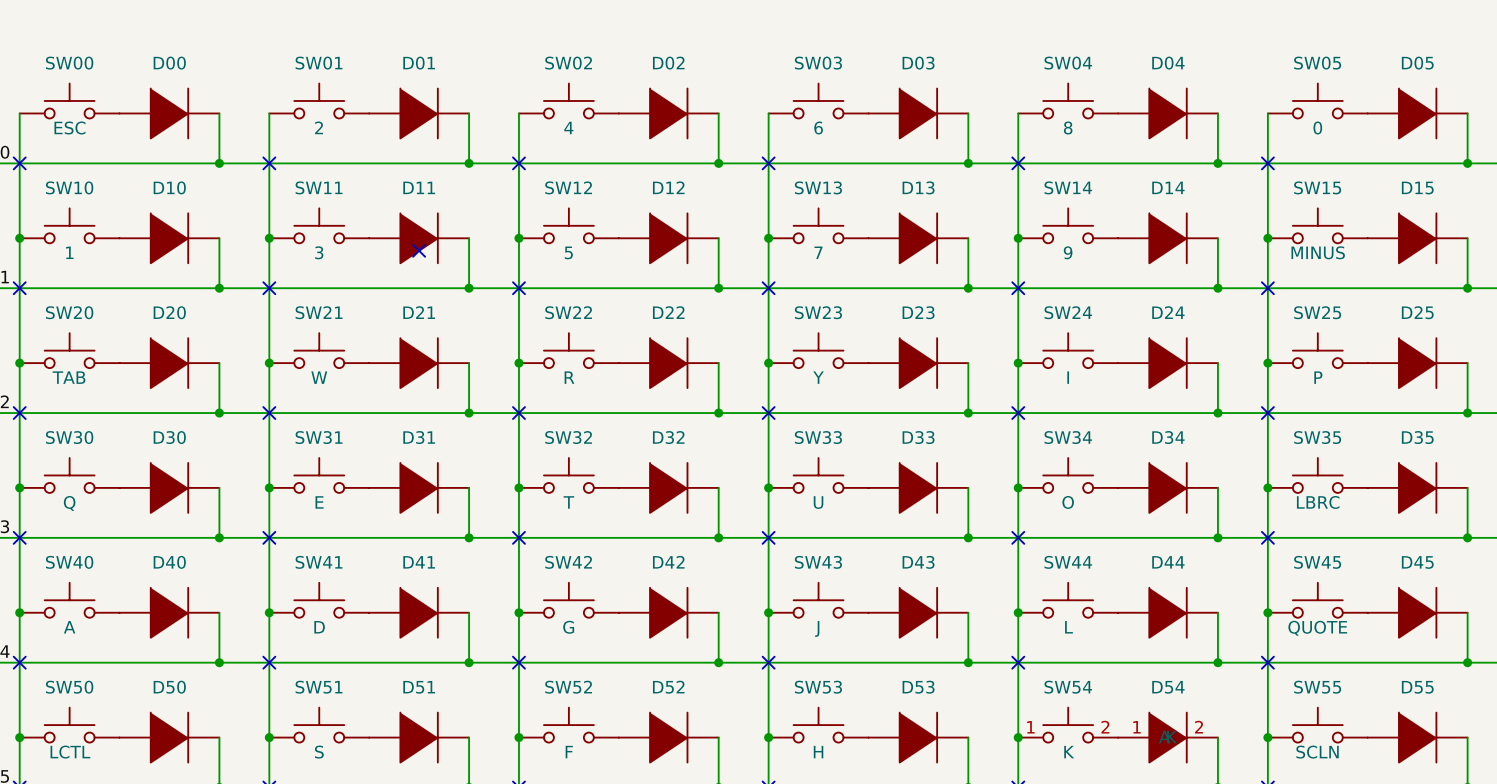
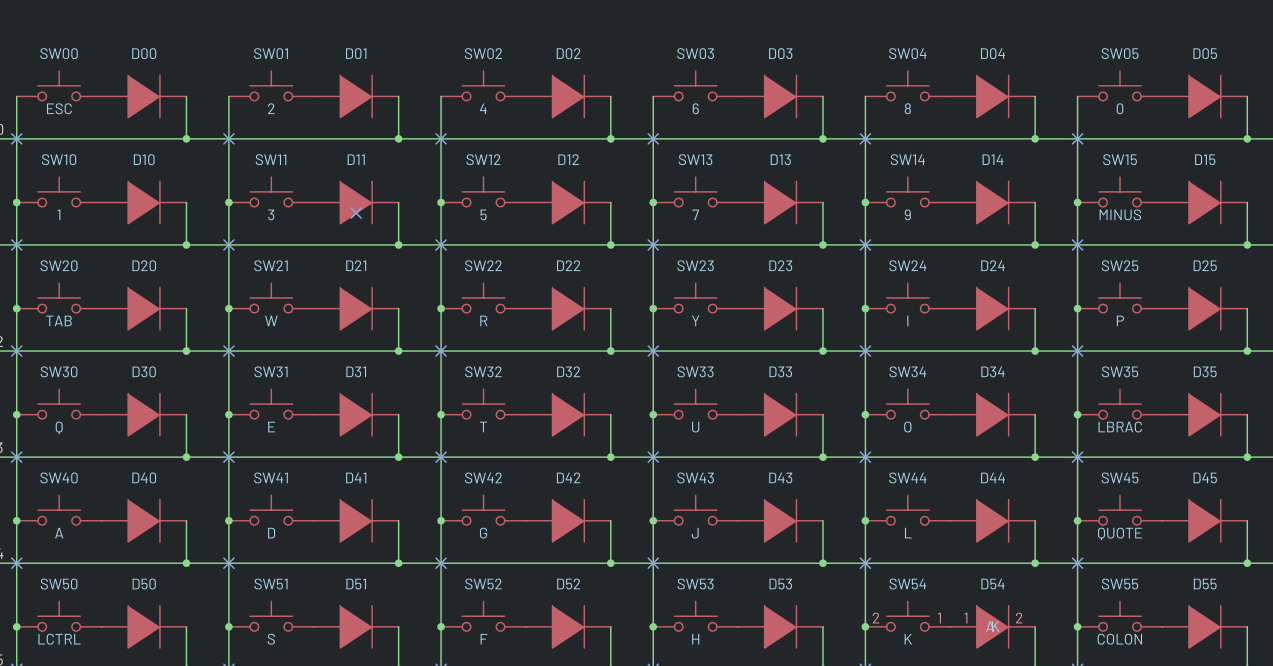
SW35 value: LBRC (1318, 502) -> LBRAC (1120, 427)
SW54 flip: as is (1068, 725) -> left-right (907, 616)
SW50 value: LCTL (70, 752) -> LCTRL (59, 639)
SW55 value: SCLN (1317, 752) -> COLON (1119, 639)

